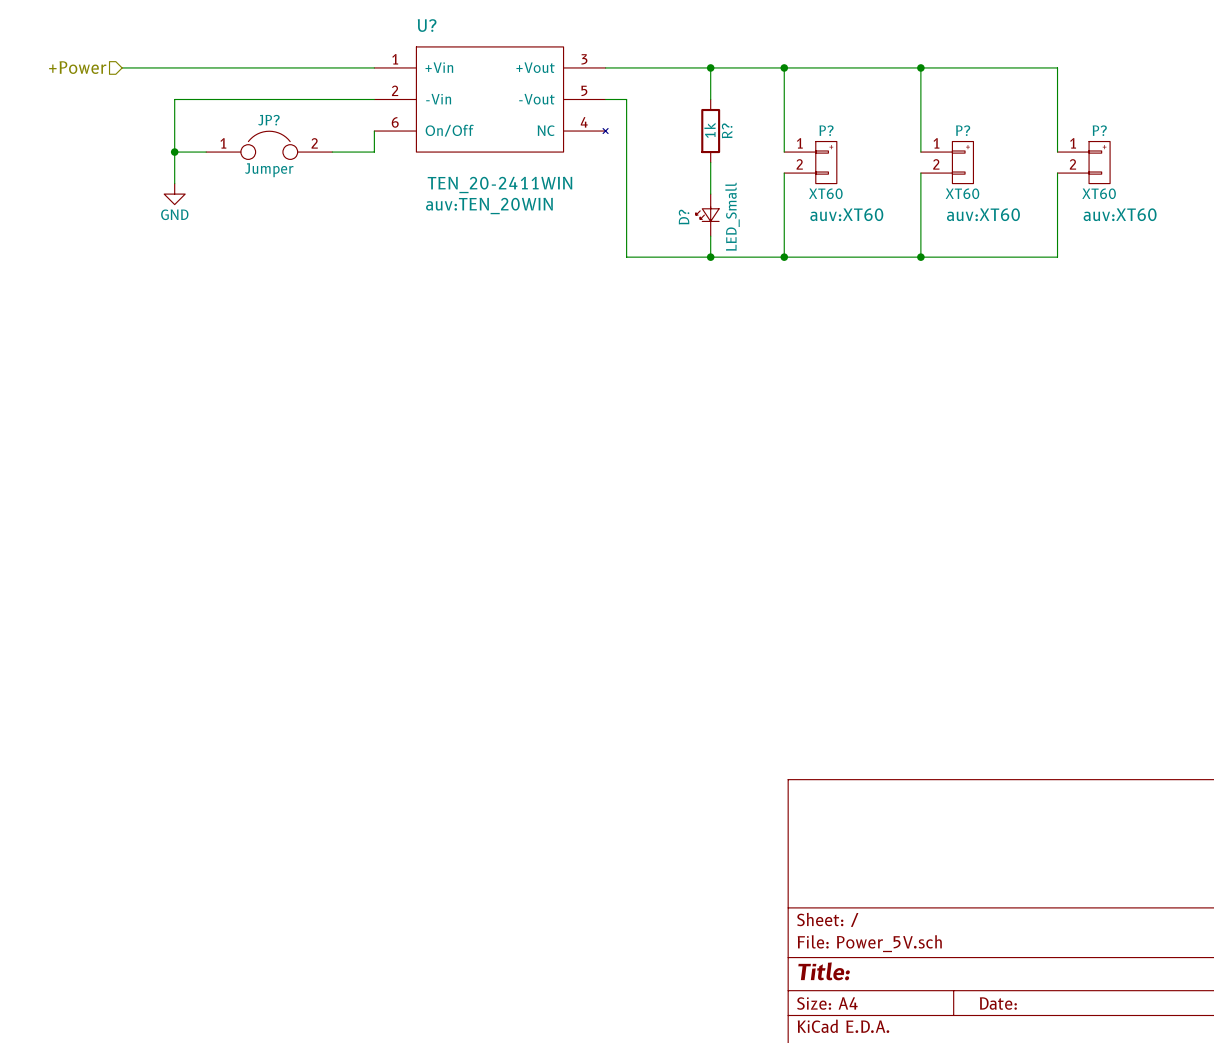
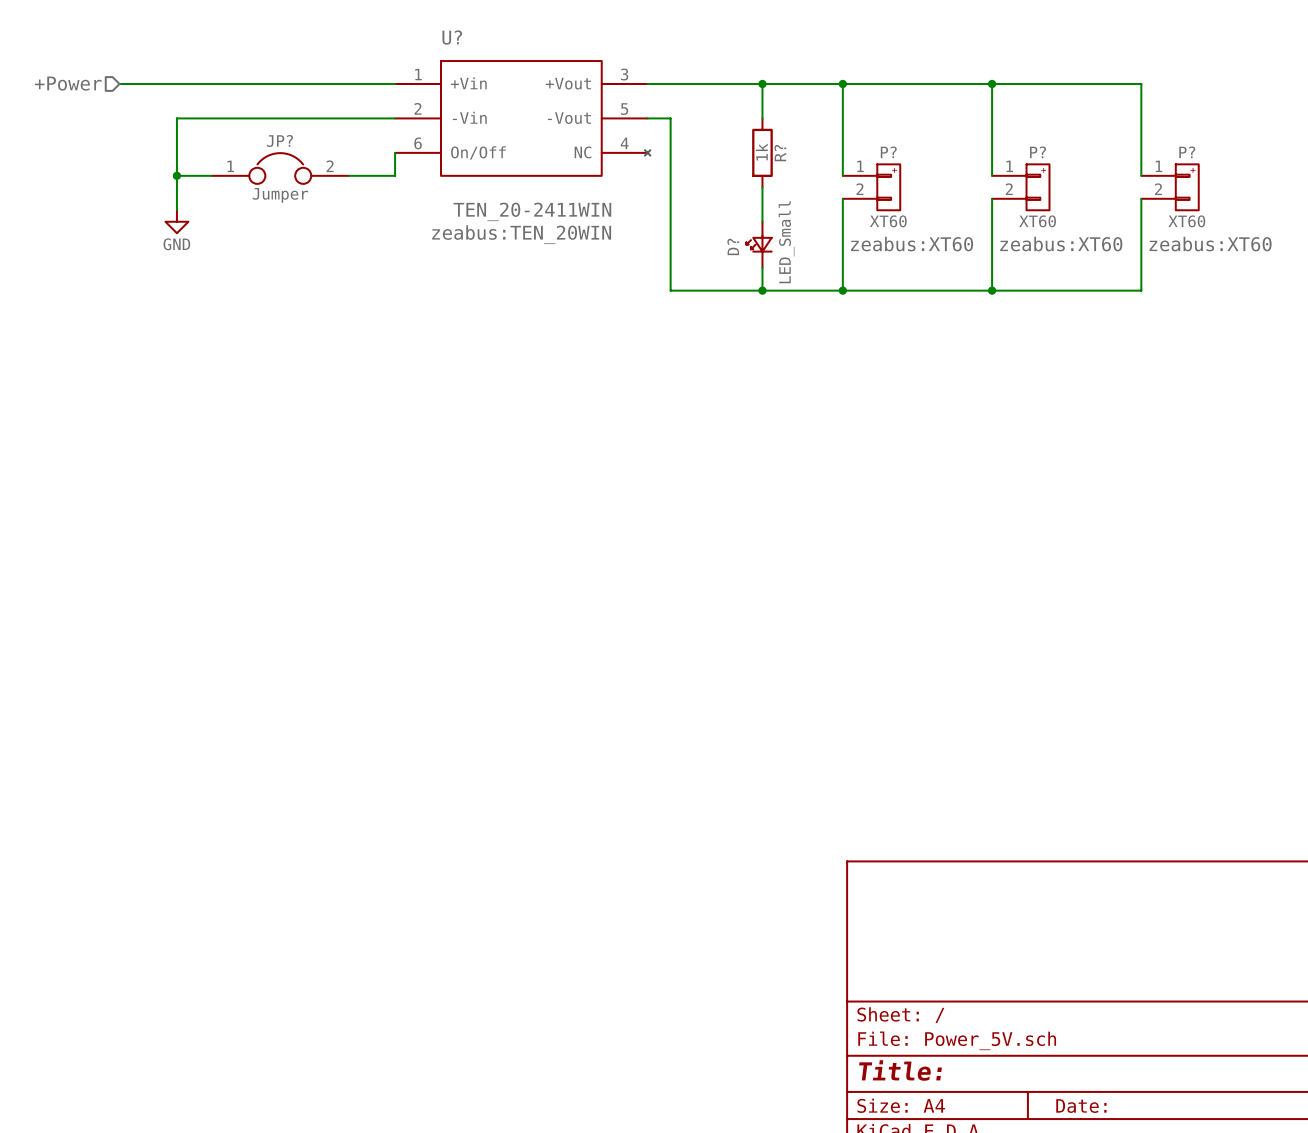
U? text: auv:TEN_20WIN (489, 206) -> zeabus:TEN_20WIN (521, 234)
P? text: auv:XT60 (846, 214) -> zeabus:XT60 (912, 244)
P? text: auv:XT60 (983, 214) -> zeabus:XT60 (1061, 244)
P? text: auv:XT60 (1120, 214) -> zeabus:XT60 (1210, 244)

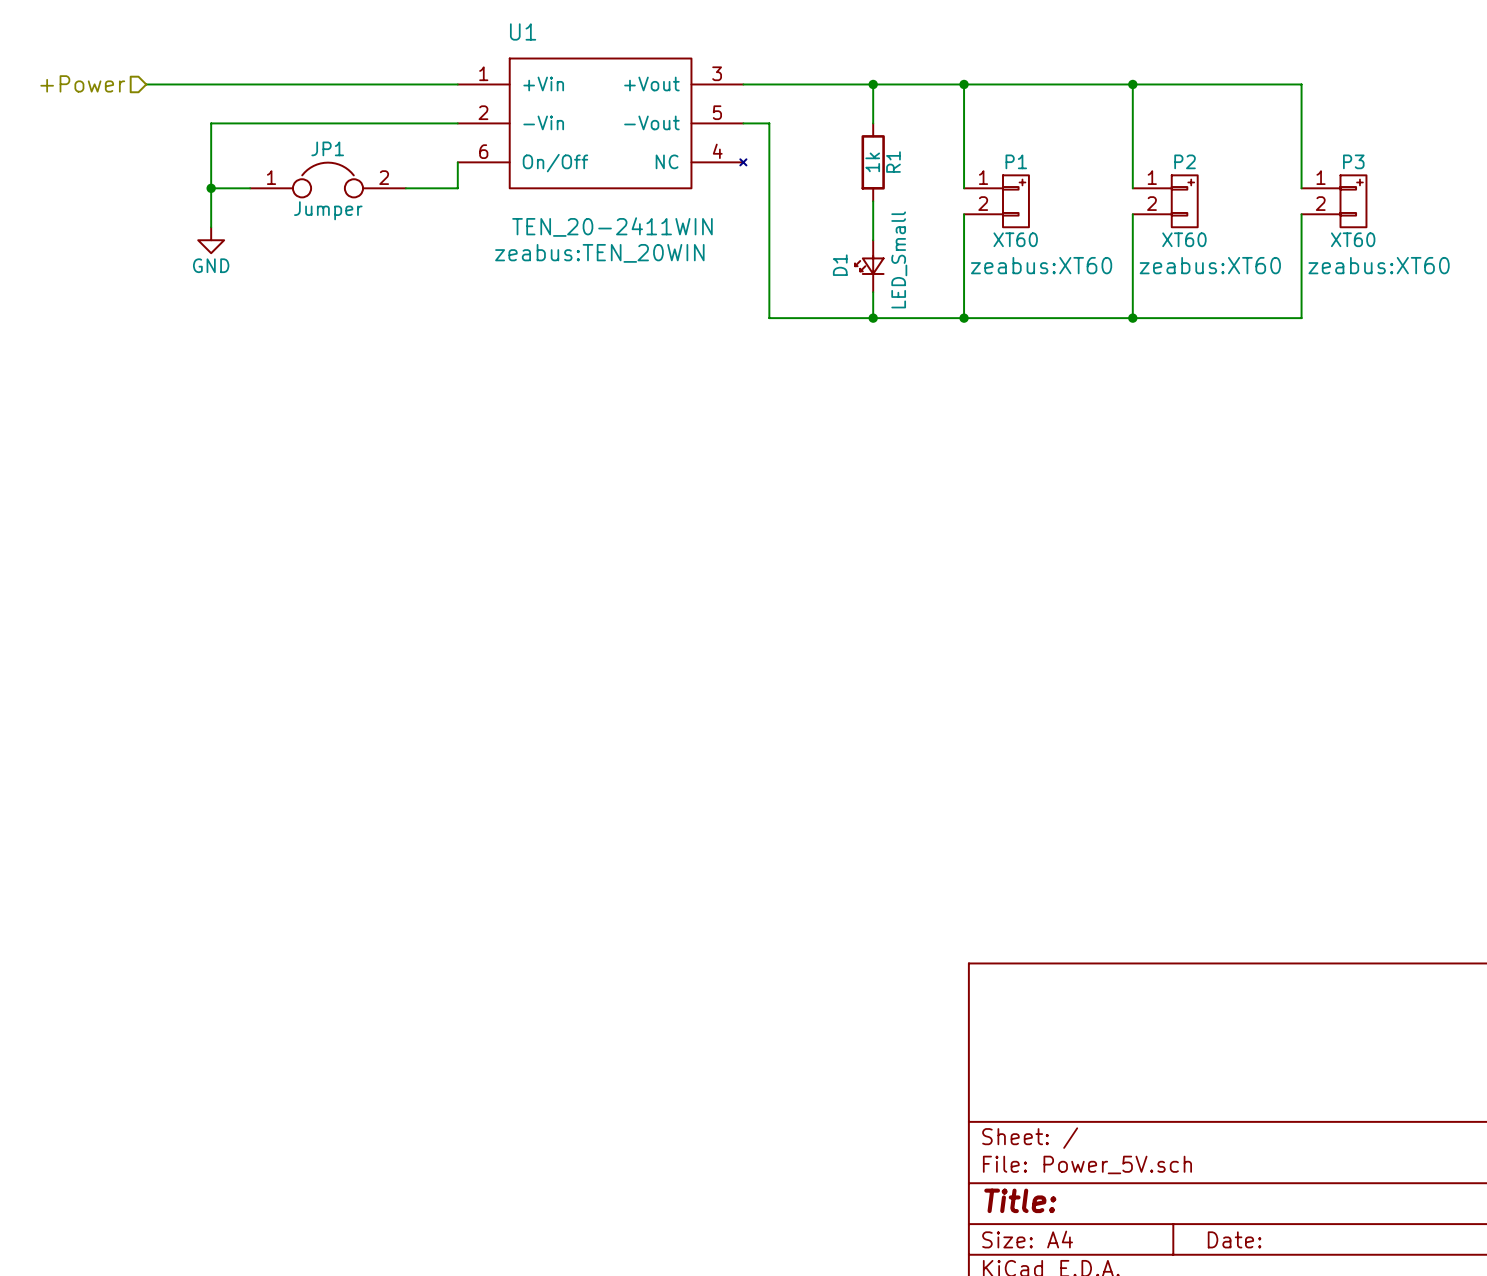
U? name: U? (452, 37) -> U1 (523, 31)
JP? name: JP? (279, 140) -> JP1 (327, 148)
P? name: P? (888, 152) -> P1 (1016, 161)
P? name: P? (1038, 152) -> P2 (1185, 161)
P? name: P? (1187, 152) -> P3 (1353, 161)
R? name: R? (780, 153) -> R1 (893, 162)
D? name: D? (733, 246) -> D1 (840, 265)

